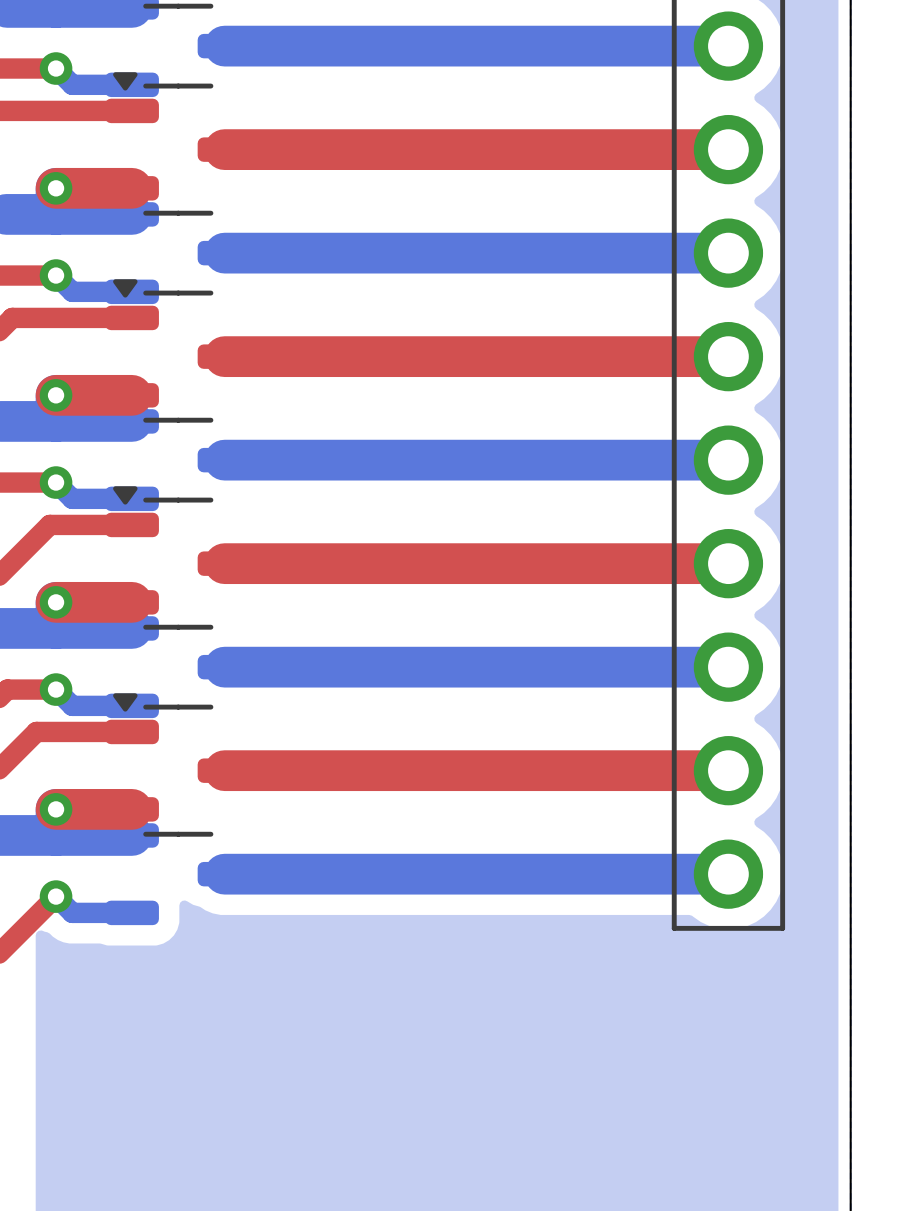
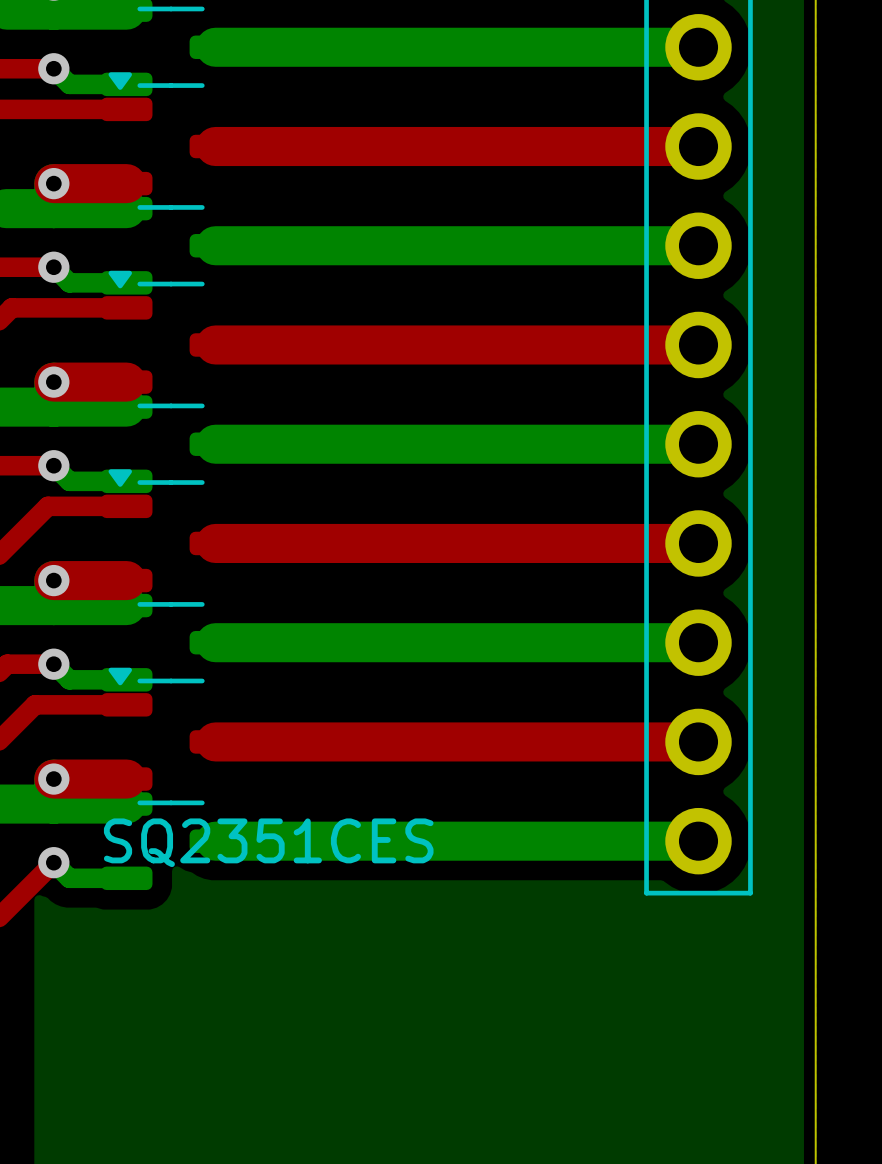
part value: none -> SQ2351CES (268, 842)

